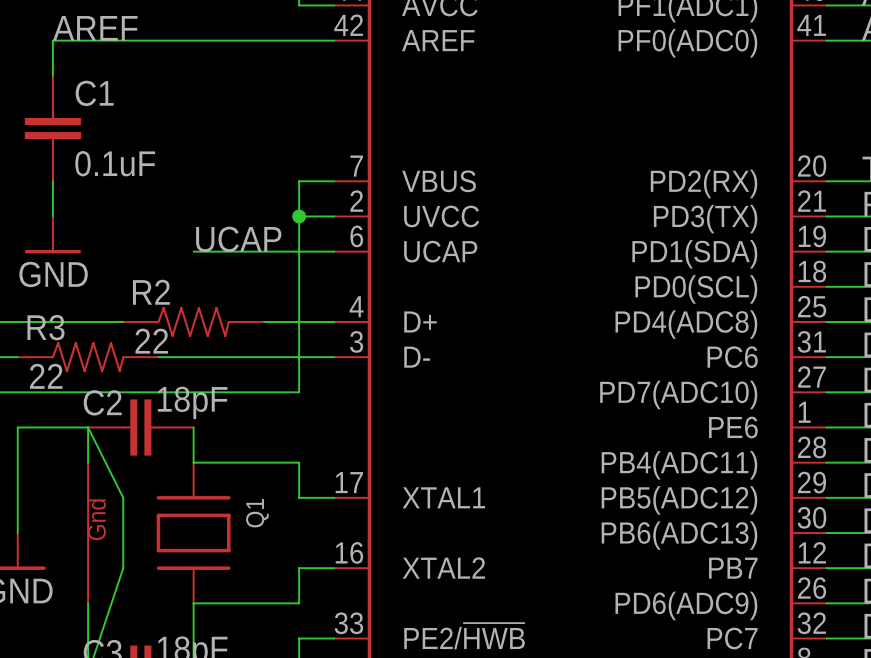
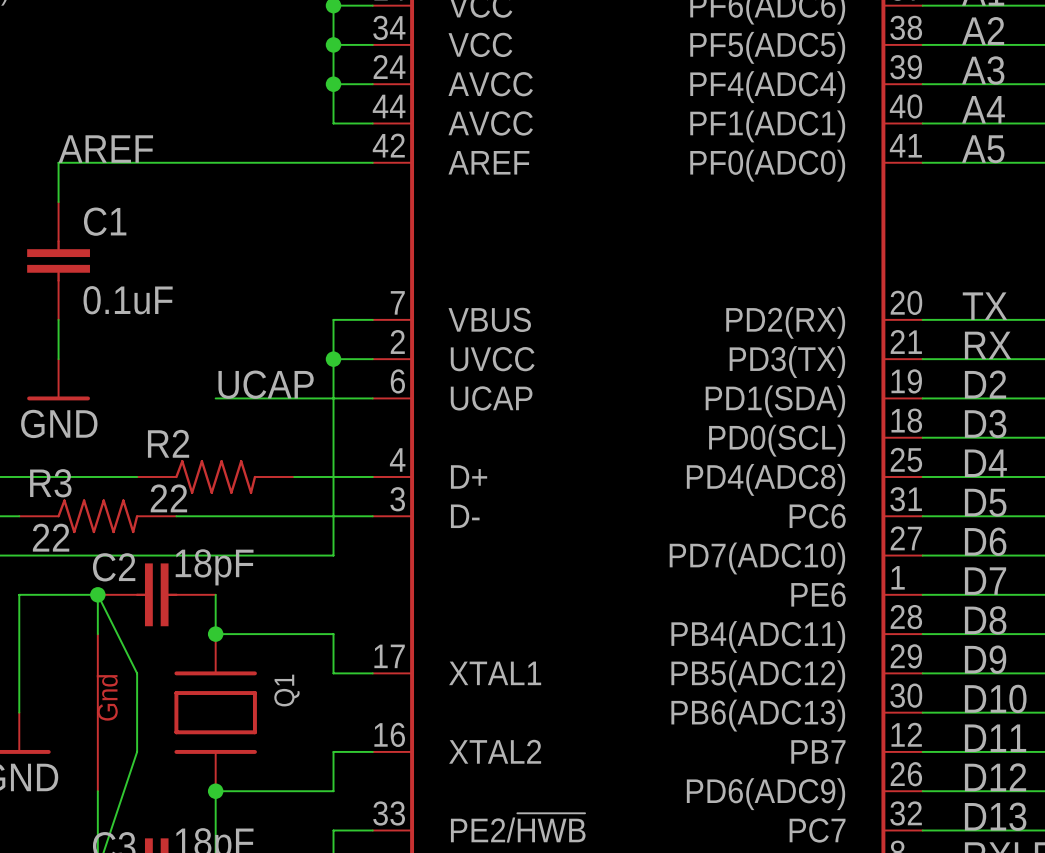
junction: none -> (97, 594)
junction: none -> (215, 634)
junction: none -> (215, 791)

